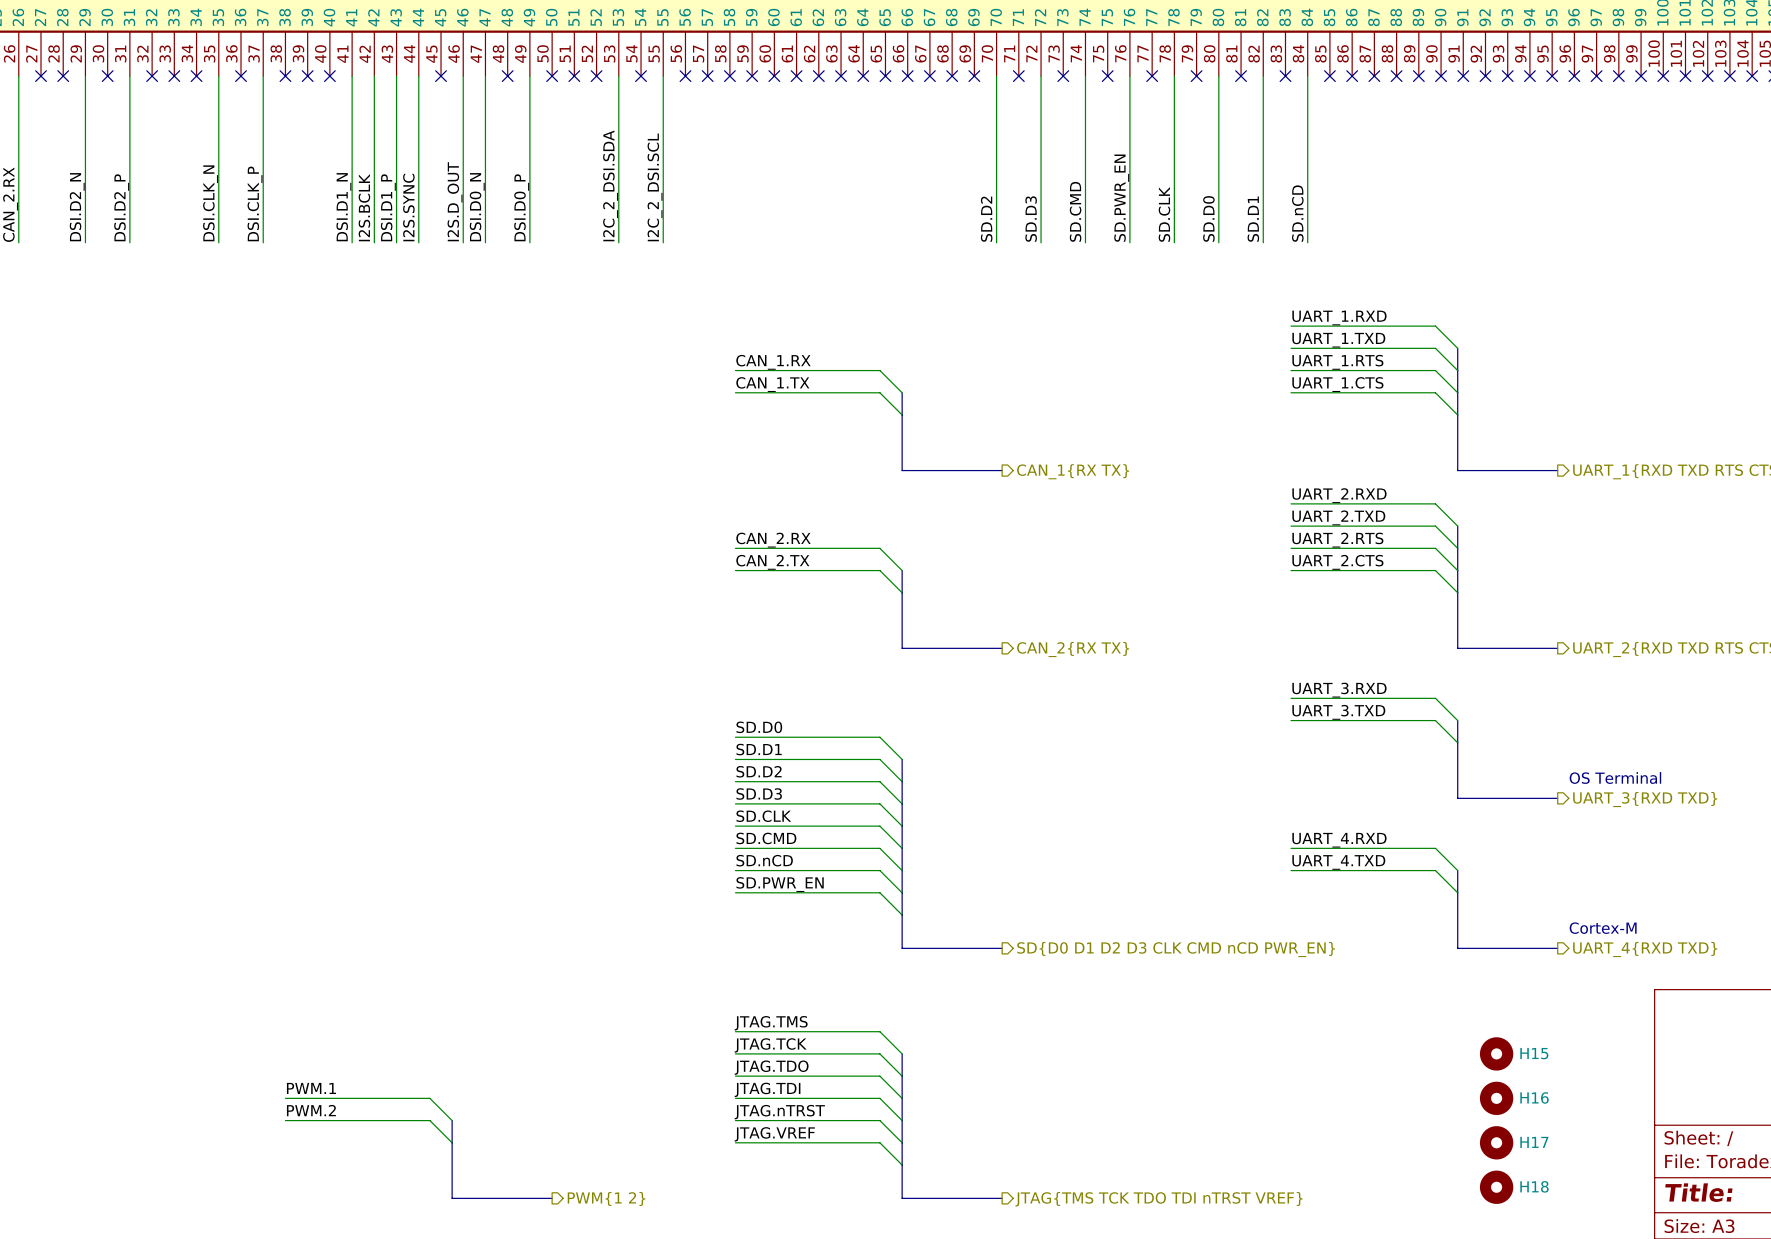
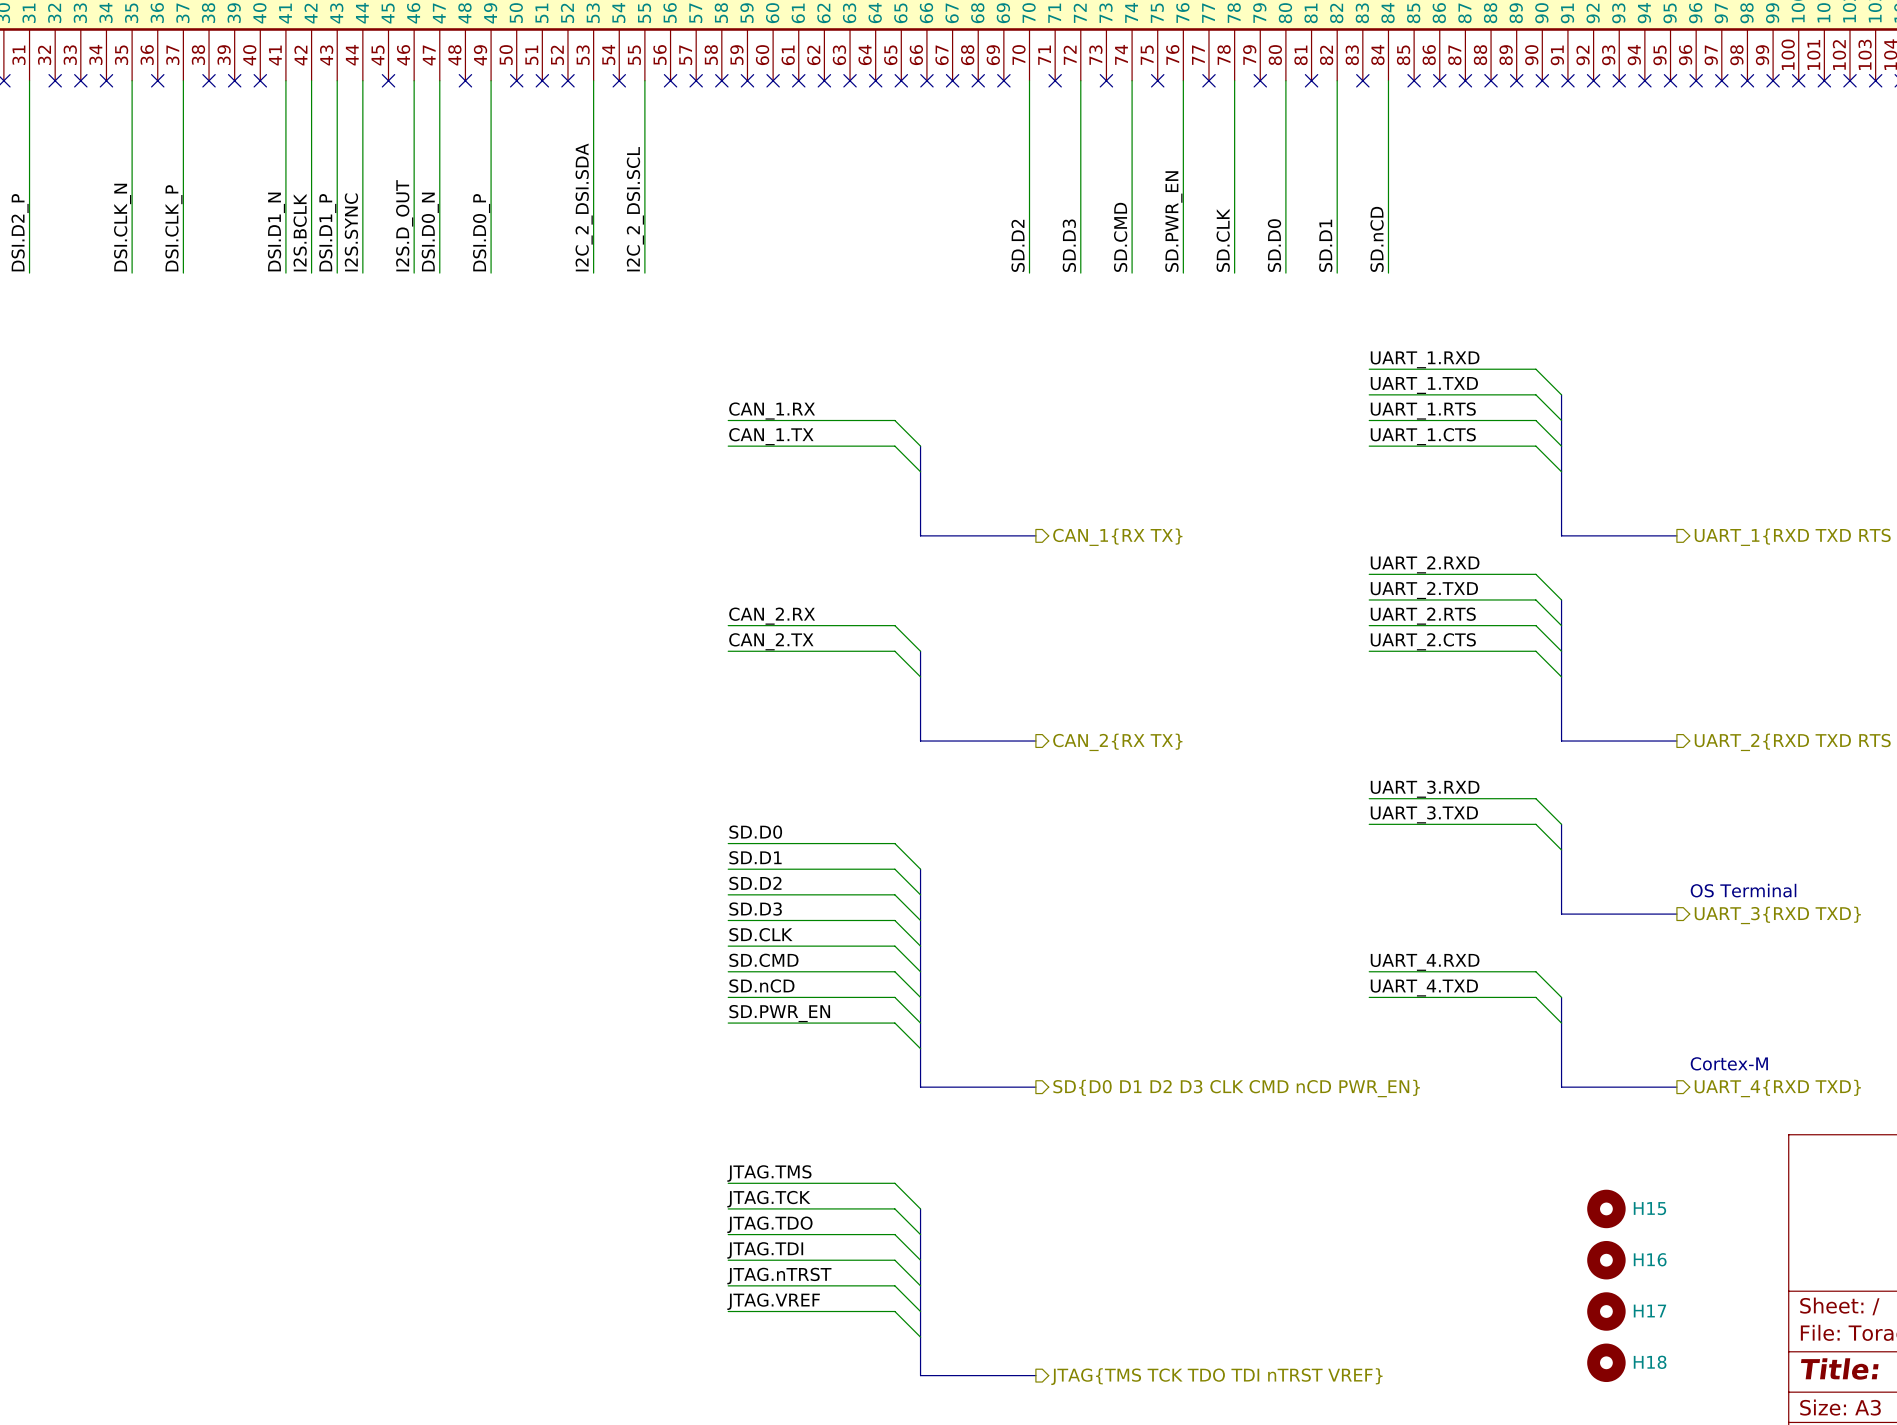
label: PWM.1 (311, 1088) -> none
wire: (285, 1098) (429, 1098) (452, 1120) -> none
label: PWM.2 (311, 1110) -> none
wire: (285, 1120) (429, 1120) (452, 1142) -> none
bus: (452, 1120) (452, 1198) (552, 1198) -> none
hierarchical label: PWM{1 2} (606, 1198) -> none

